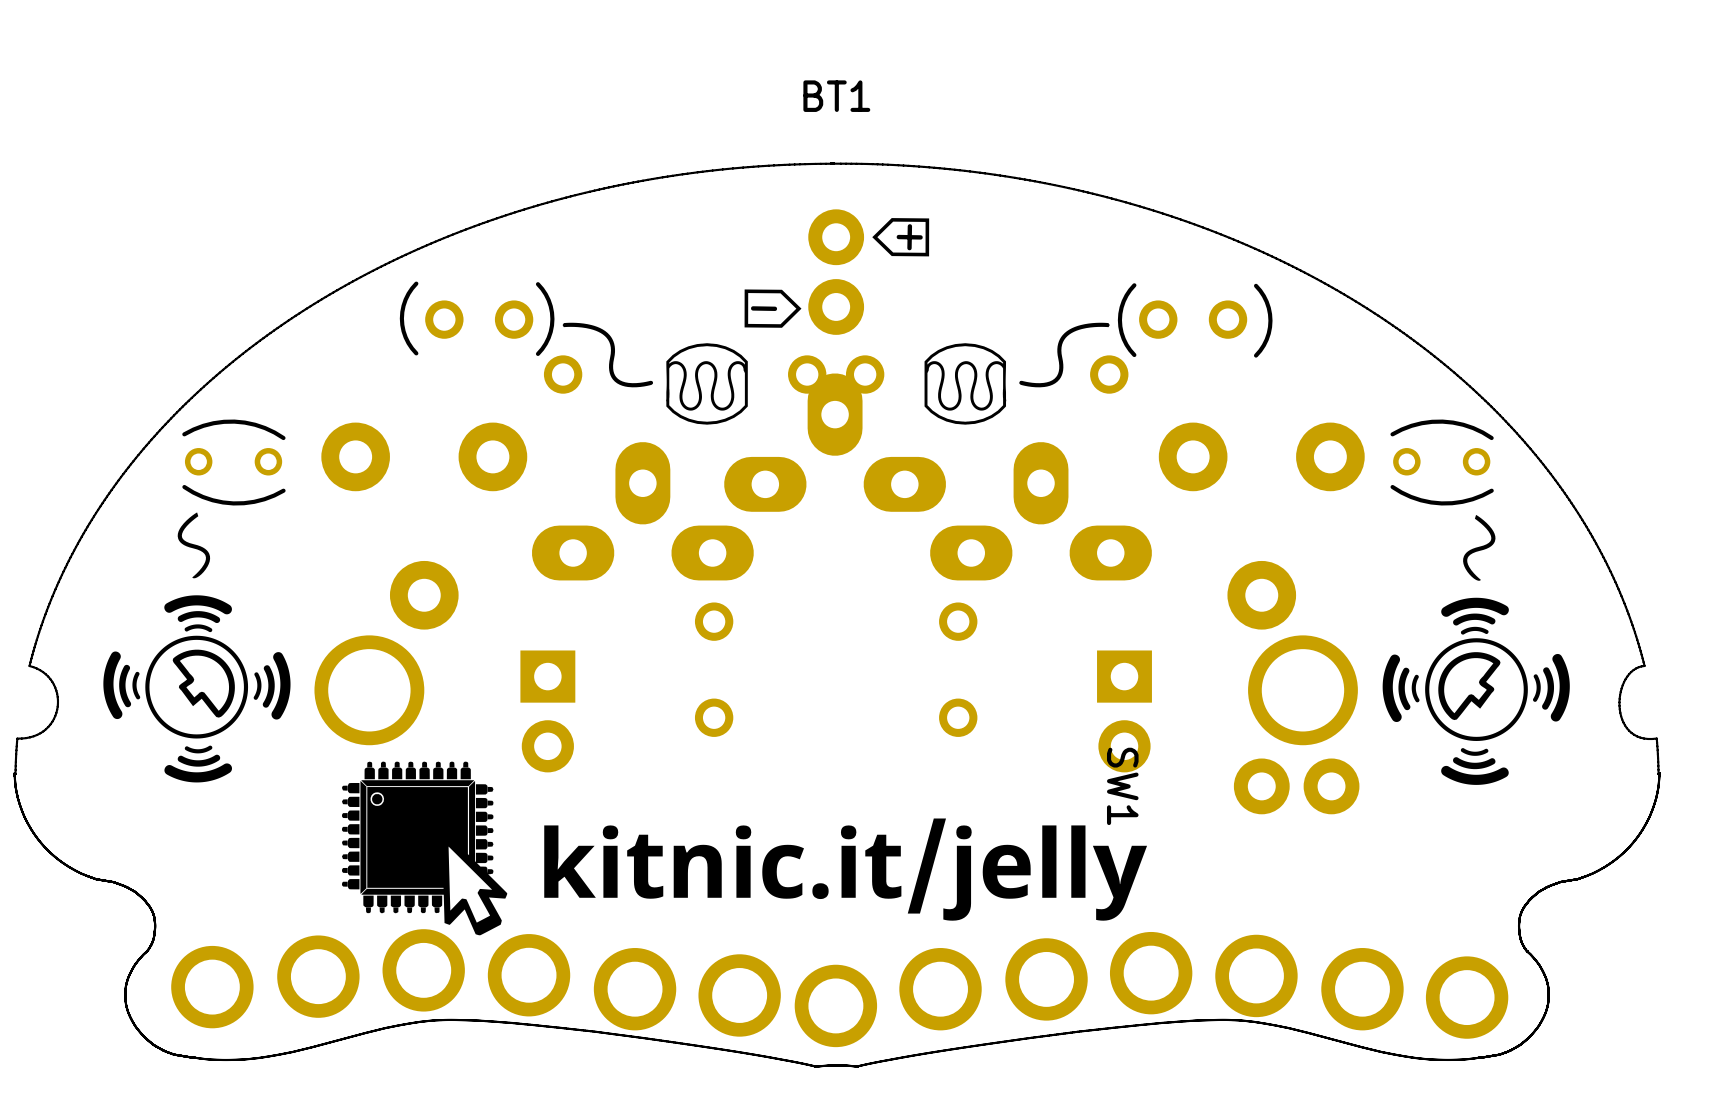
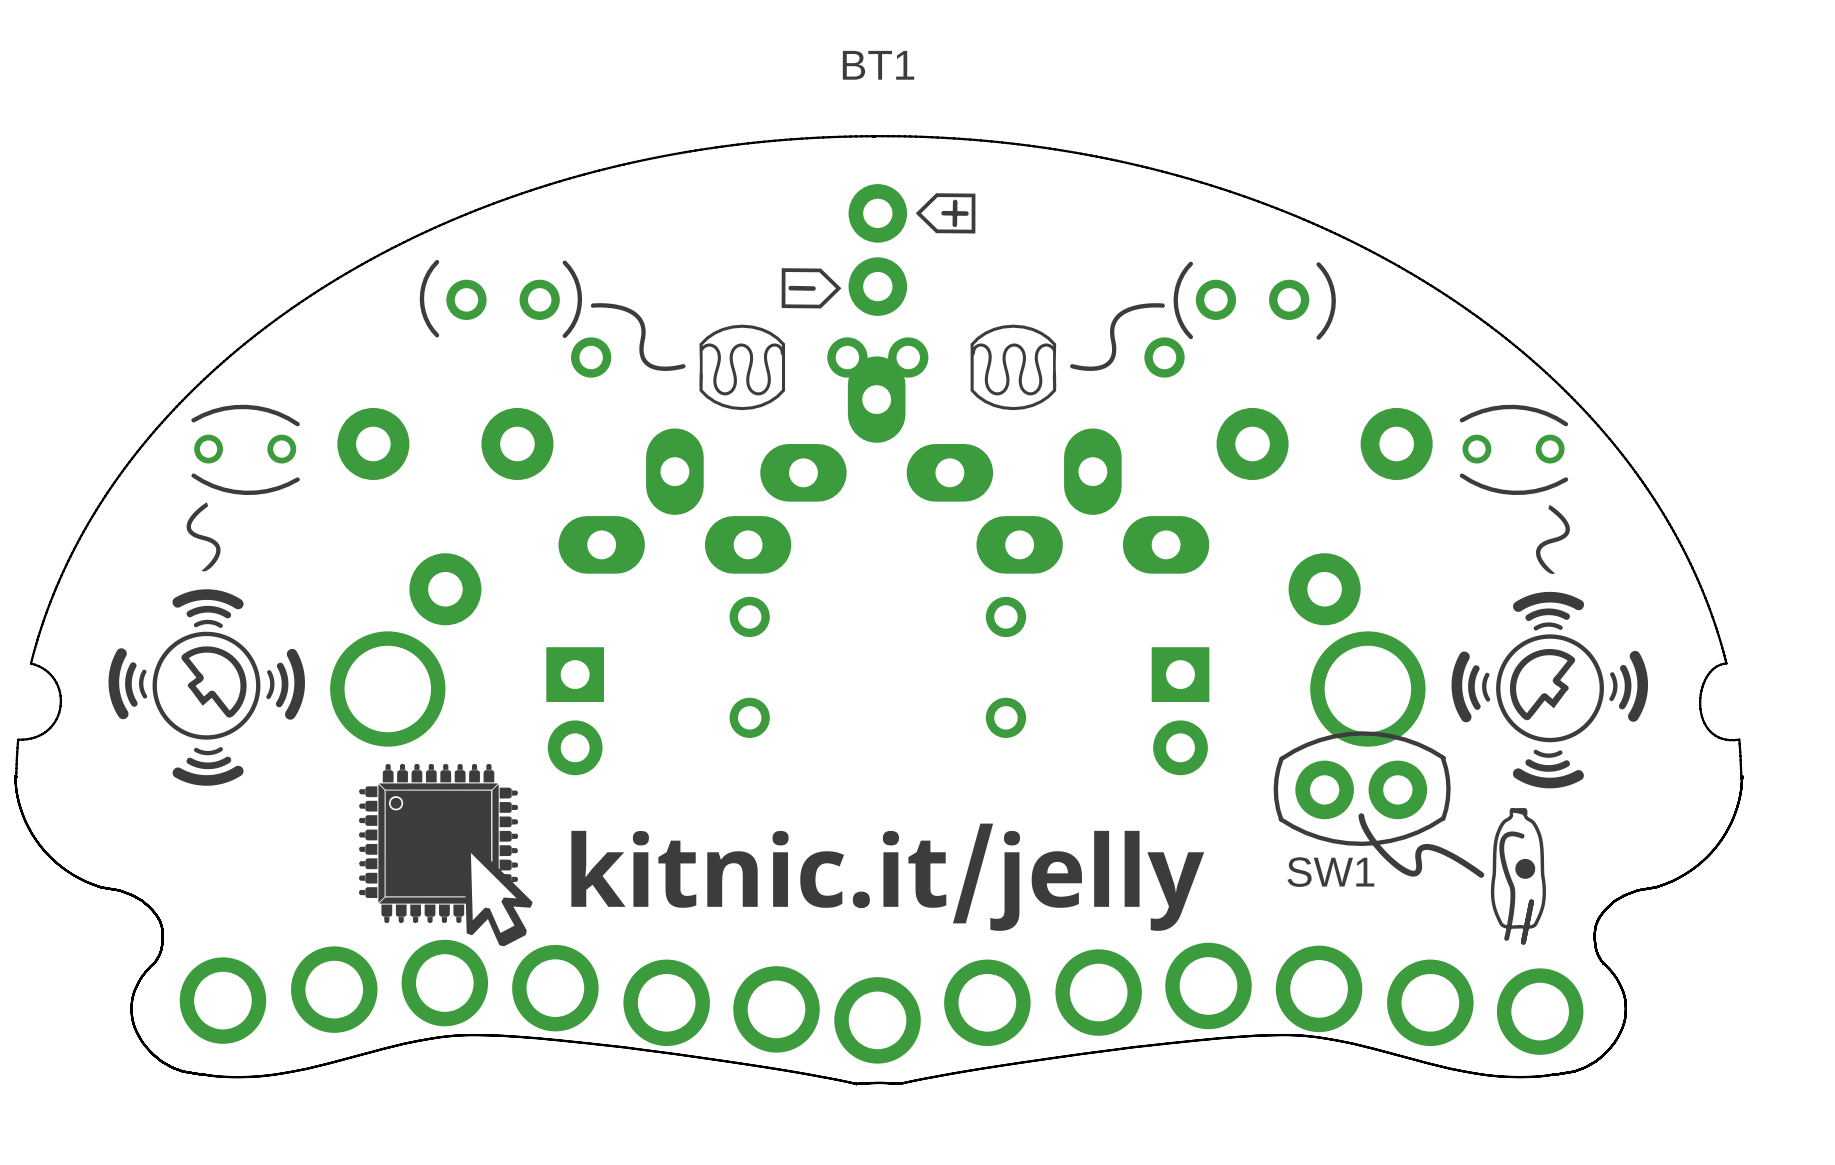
SW1 footprint: [1233, 758, 1360, 815] -> [1273, 731, 1451, 847]
SW1 name position: SW1 (1122, 786) -> SW1 (1330, 872)
drawing: none -> [1358, 807, 1546, 945]

